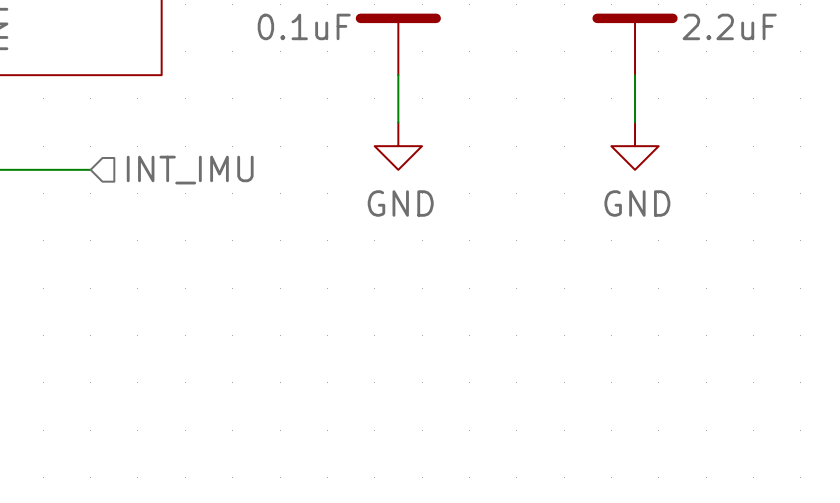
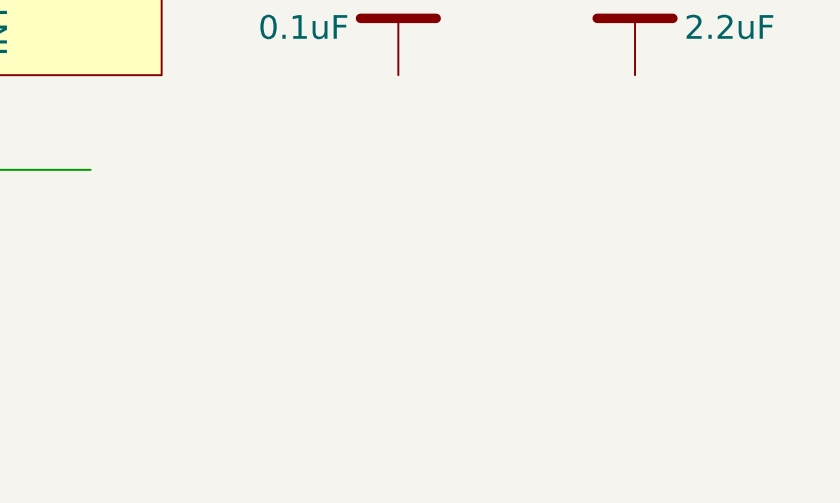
wire: (398, 75) (398, 122) -> none
wire: (635, 75) (635, 122) -> none
power symbol: GND (398, 146) -> none
power symbol: GND (635, 146) -> none
hierarchical label: INT_IMU (190, 170) -> none

